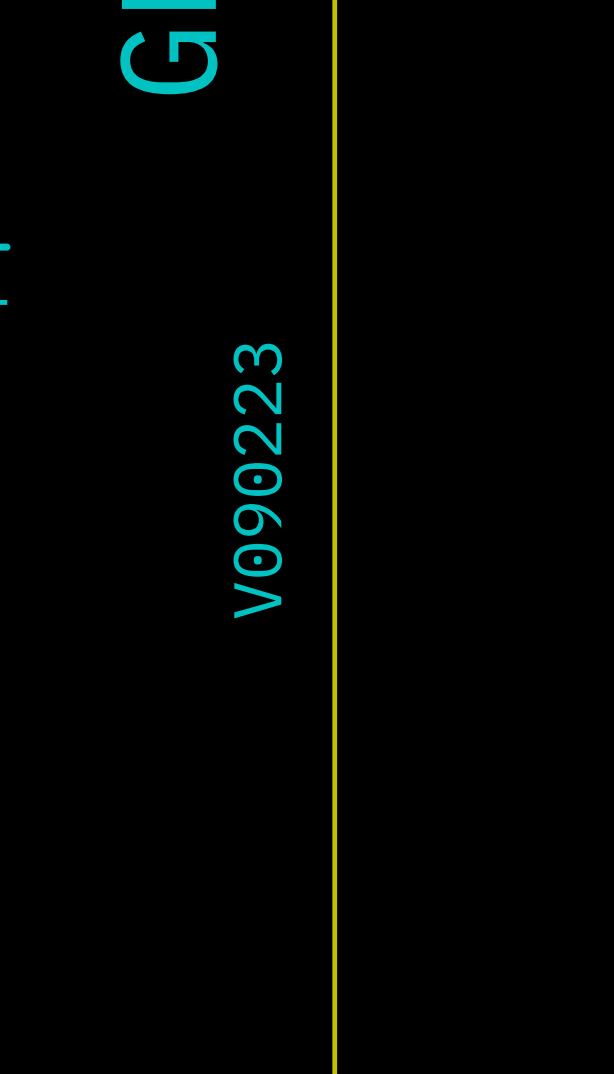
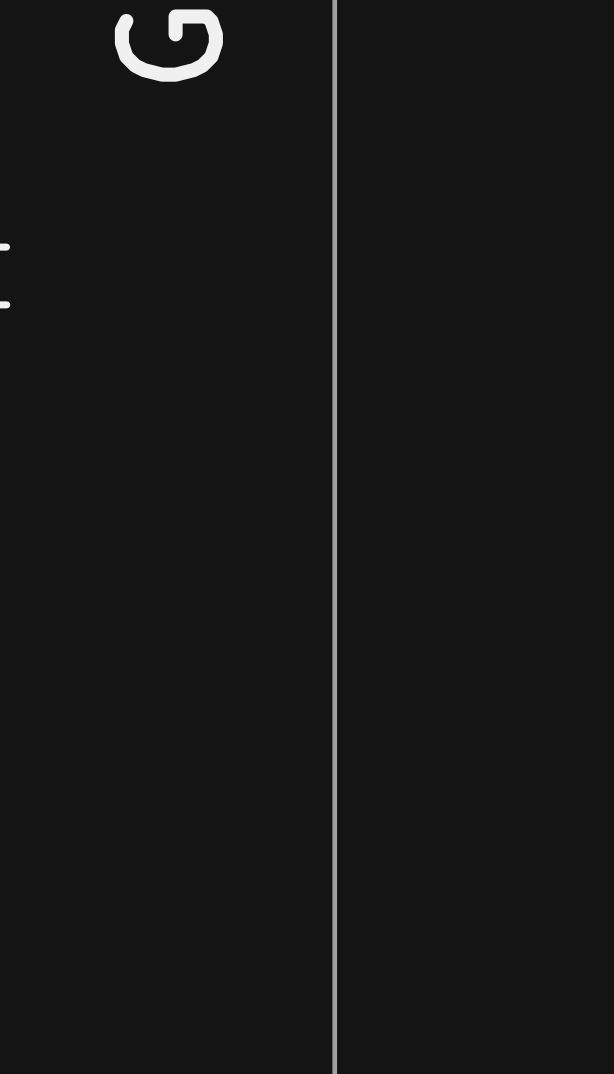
text: V090223 (257, 481) -> none

